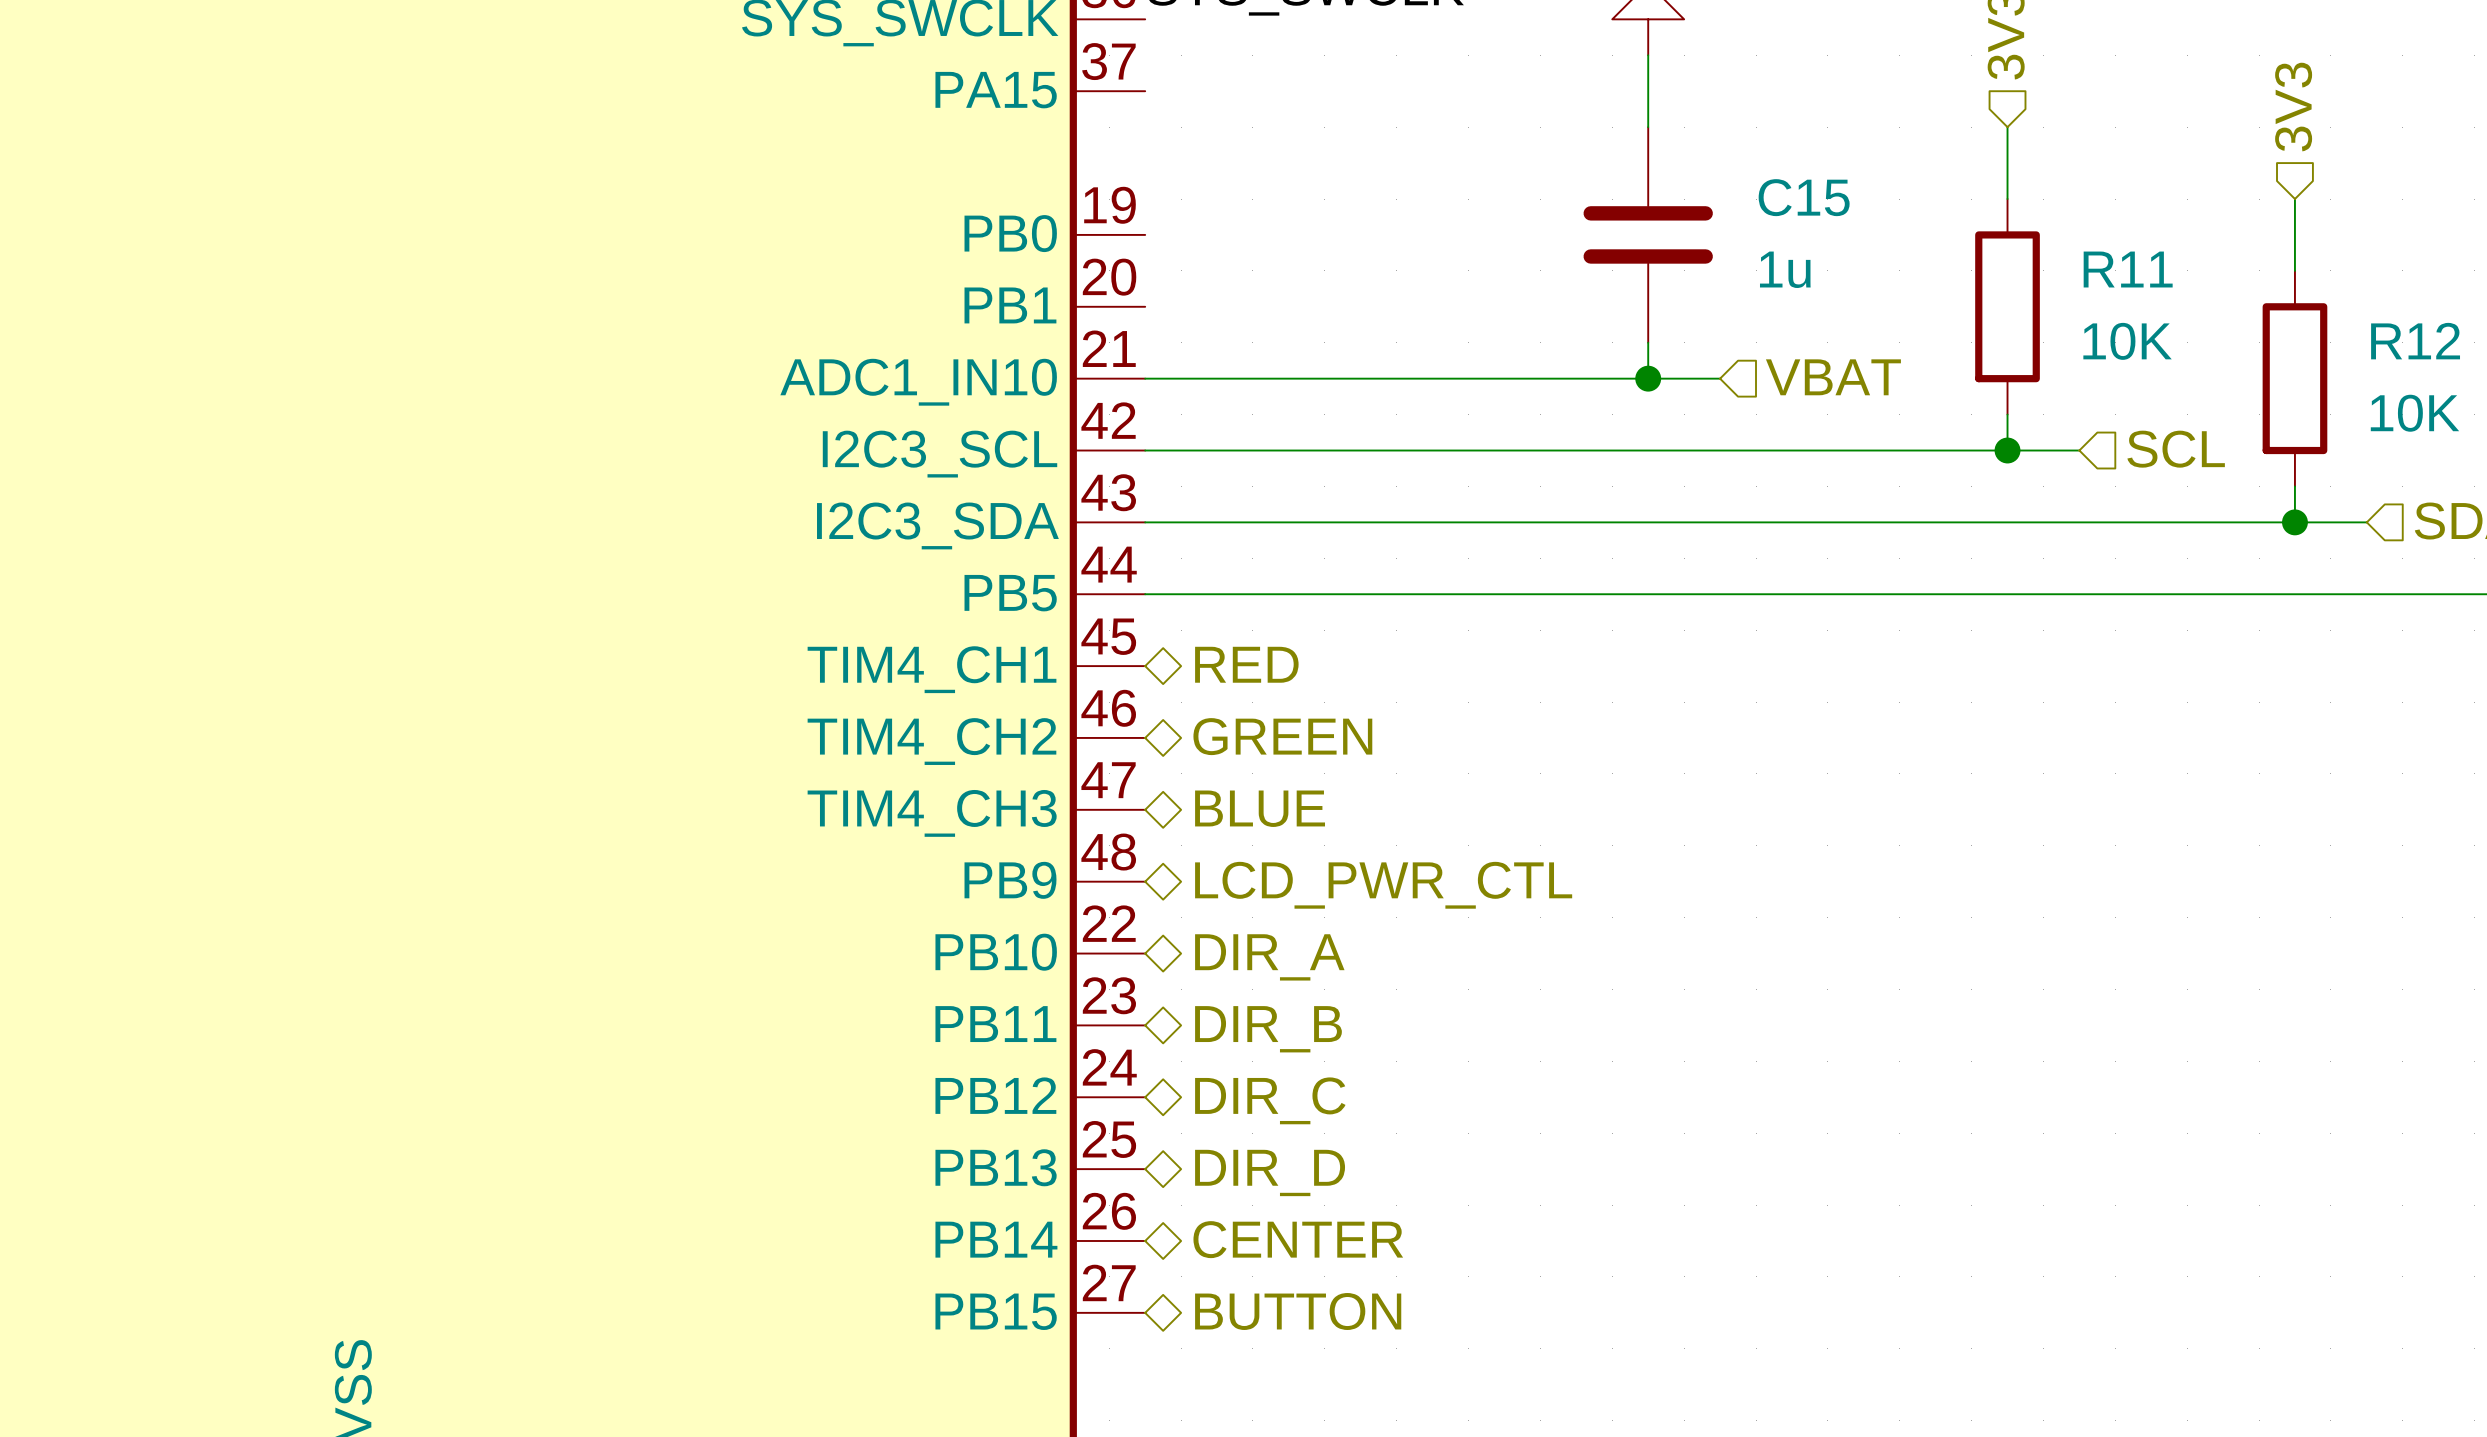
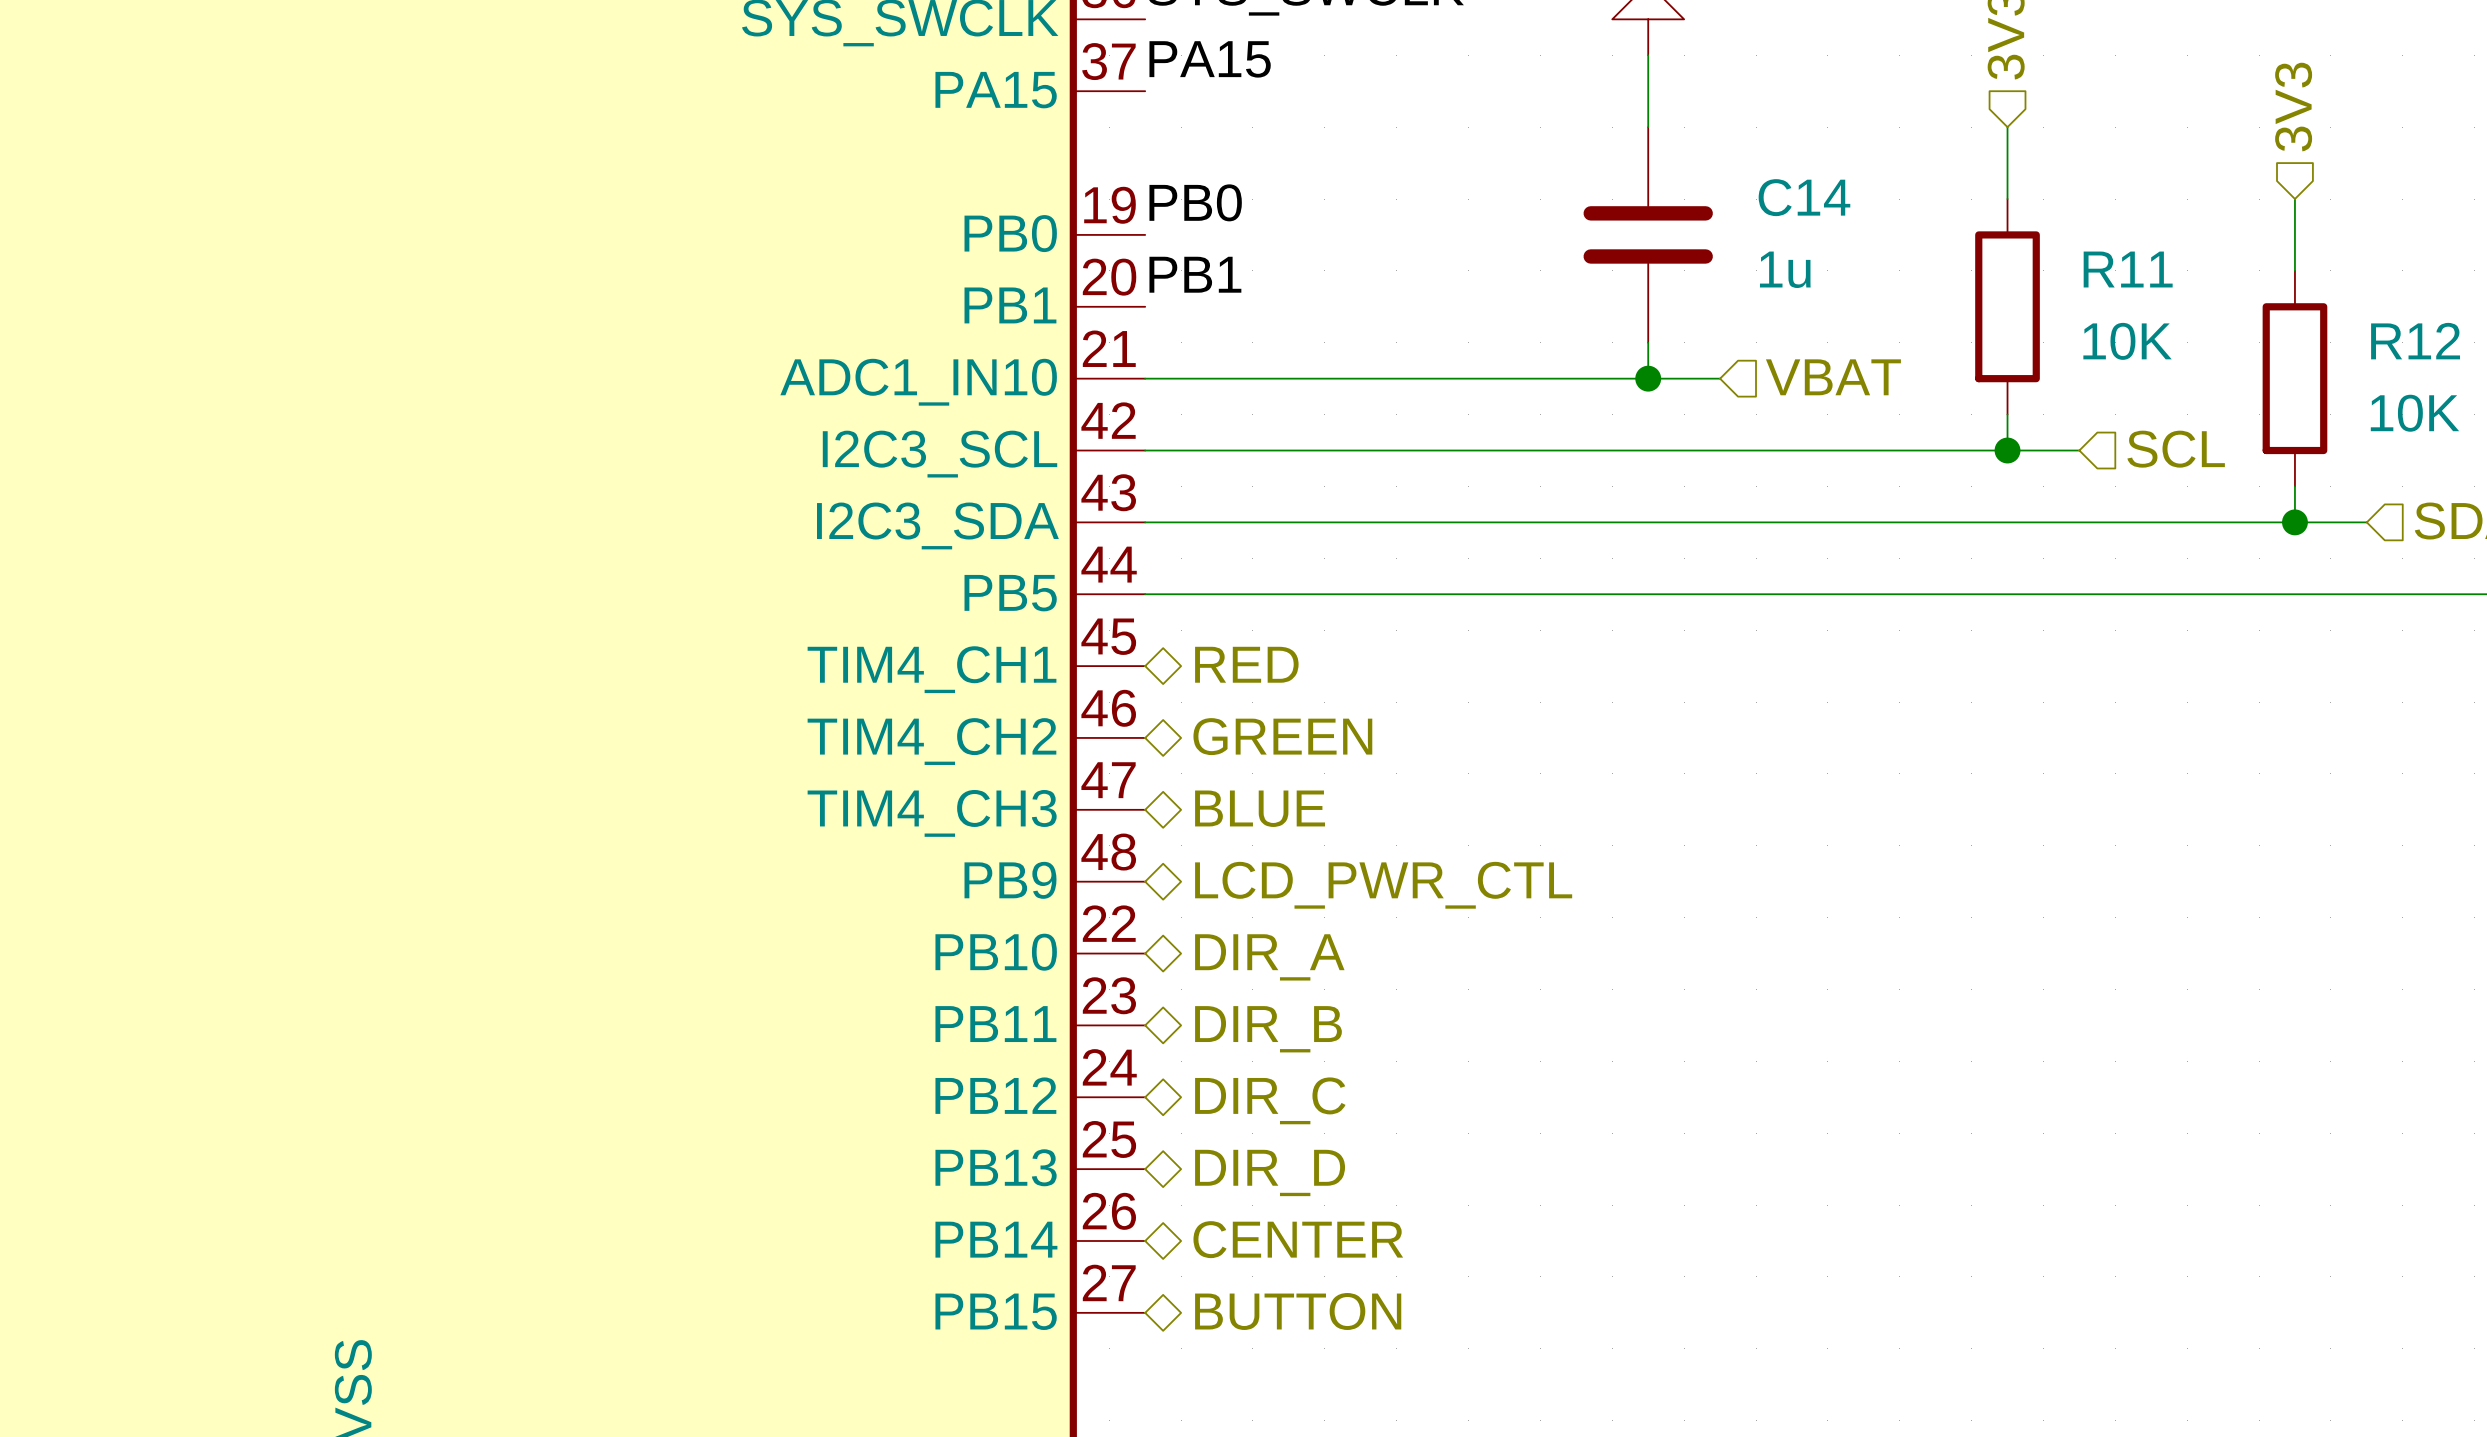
label: none -> PA15 (1210, 59)
C15 name: C15 (1804, 197) -> C14 (1804, 197)
label: none -> PB0 (1195, 202)
label: none -> PB1 (1195, 274)

